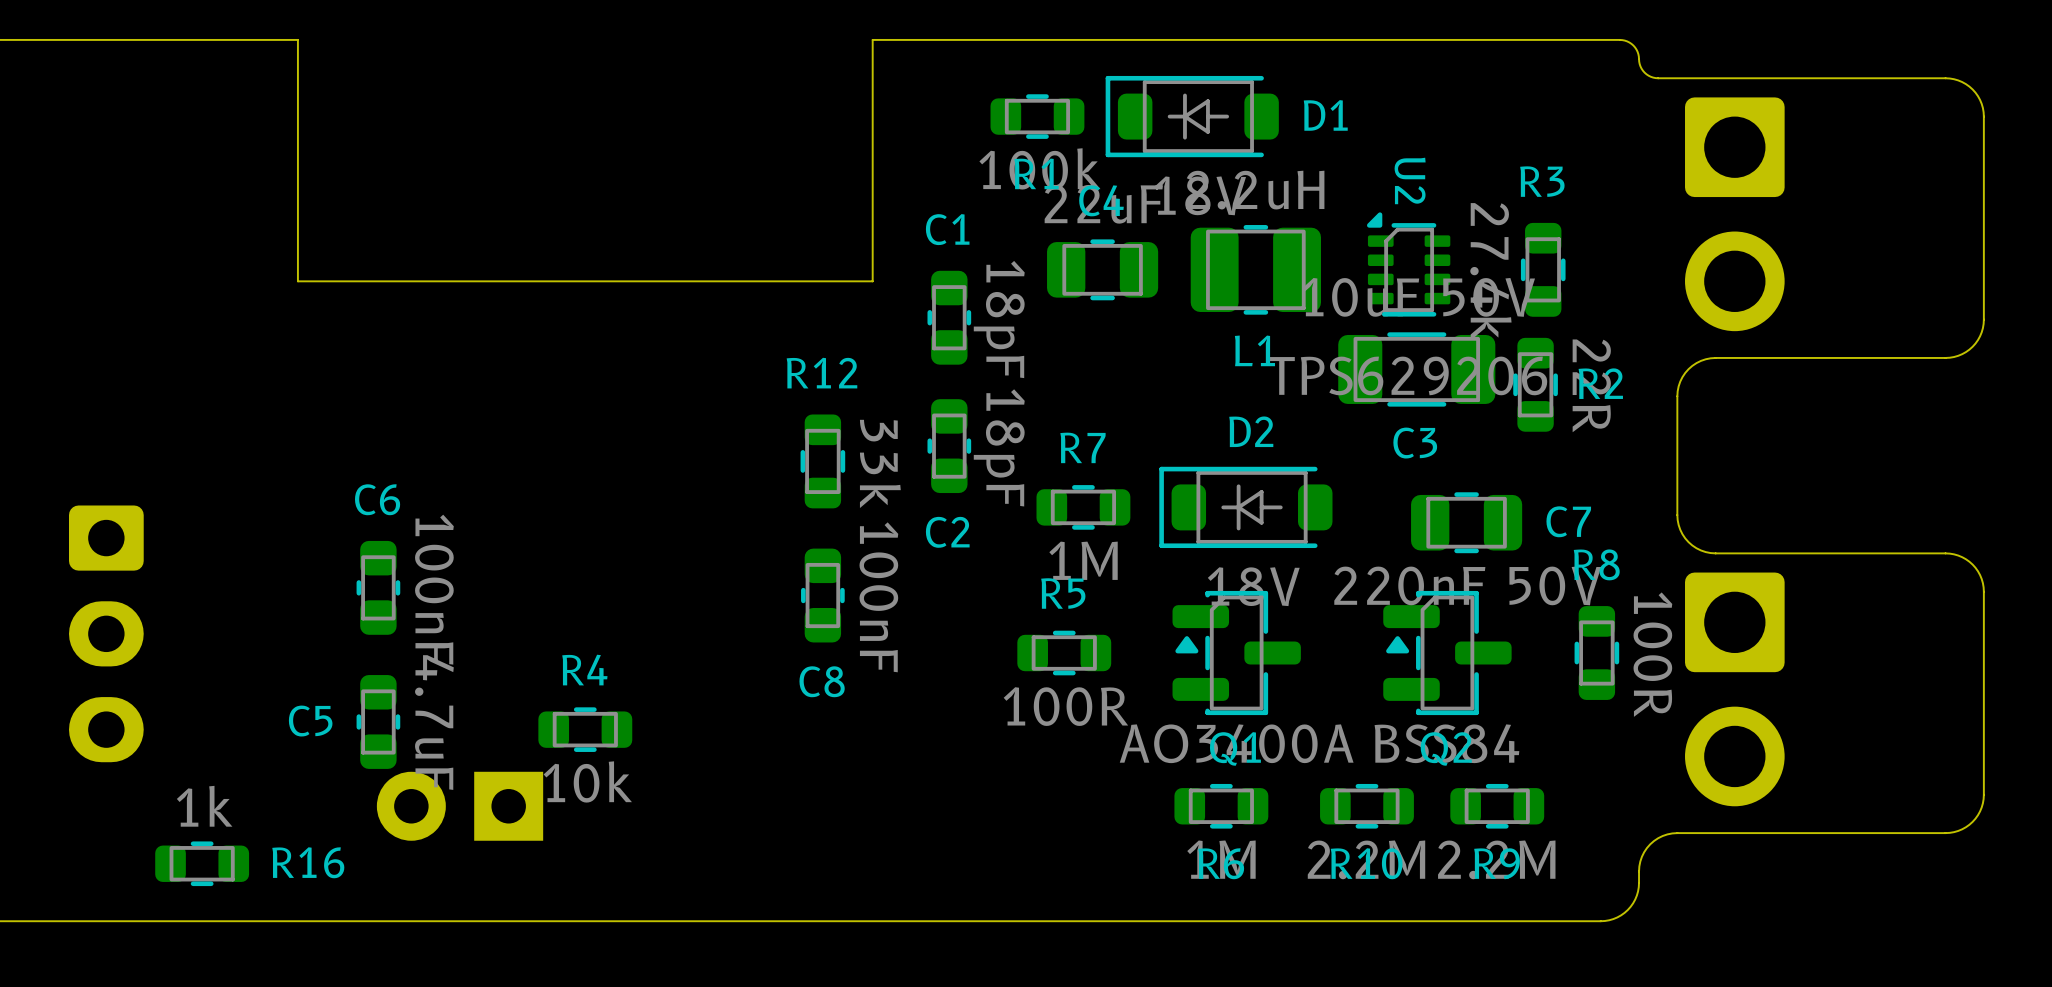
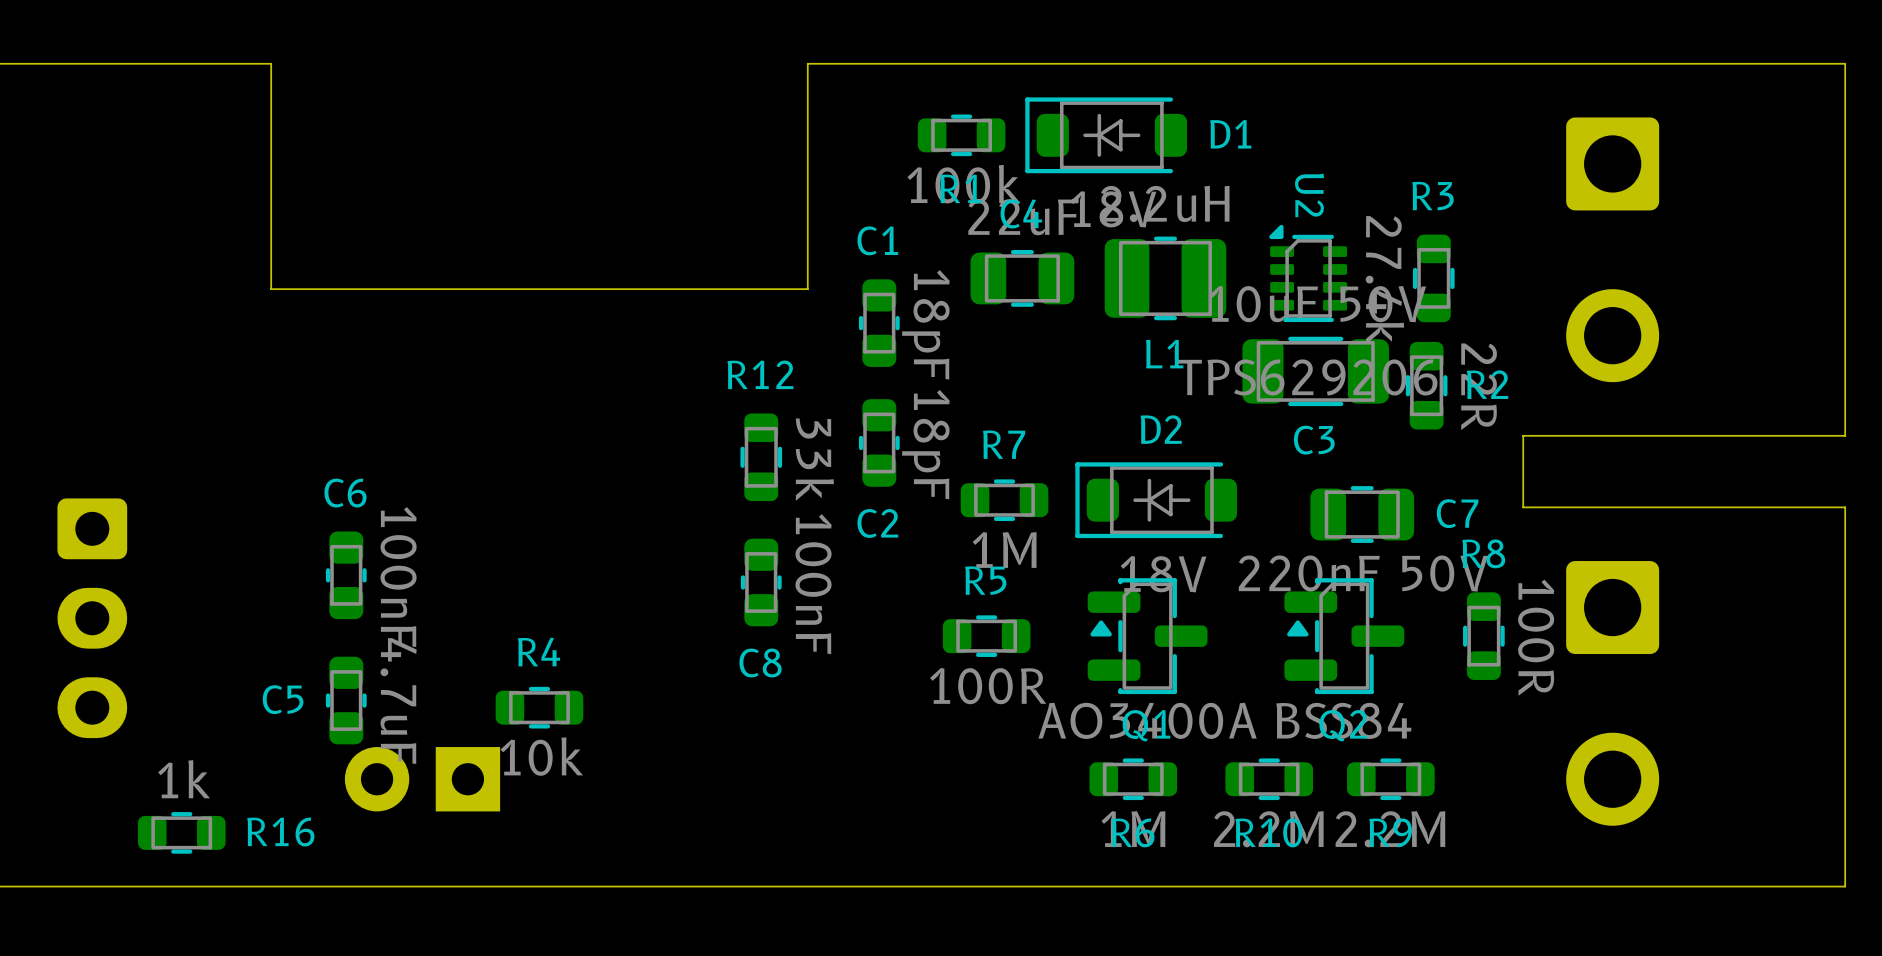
board edge: (1619, 39) (1633, 45) (1637, 51) (1642, 70) (1655, 78) (1954, 79) (1965, 84) (1975, 92) (1981, 103) (1983, 116) -> (1505, 63) (1845, 63) (1845, 135)
part footprint: [1685, 97, 1785, 332] -> [1566, 117, 1660, 383]
board edge: (1983, 319) (1981, 332) (1975, 343) (1965, 352) (1949, 357) (1705, 359) (1692, 365) (1685, 372) (1678, 386) (1677, 396) (1677, 520) (1682, 534) (1696, 548) (1715, 553) (1949, 553) (1962, 557) (1972, 564) (1981, 579) (1983, 591) -> (1845, 324) (1845, 435) (1523, 435) (1523, 507) (1845, 507) (1845, 578)
part footprint: [1685, 572, 1785, 807] -> [1566, 561, 1660, 826]
board edge: (1983, 794) (1981, 807) (1975, 818) (1965, 827) (1949, 832) (1667, 834) (1654, 841) (1644, 852) (1639, 866) (1638, 891) (1630, 906) (1617, 917) (1600, 921) -> (1845, 768) (1845, 886) (1487, 886)

